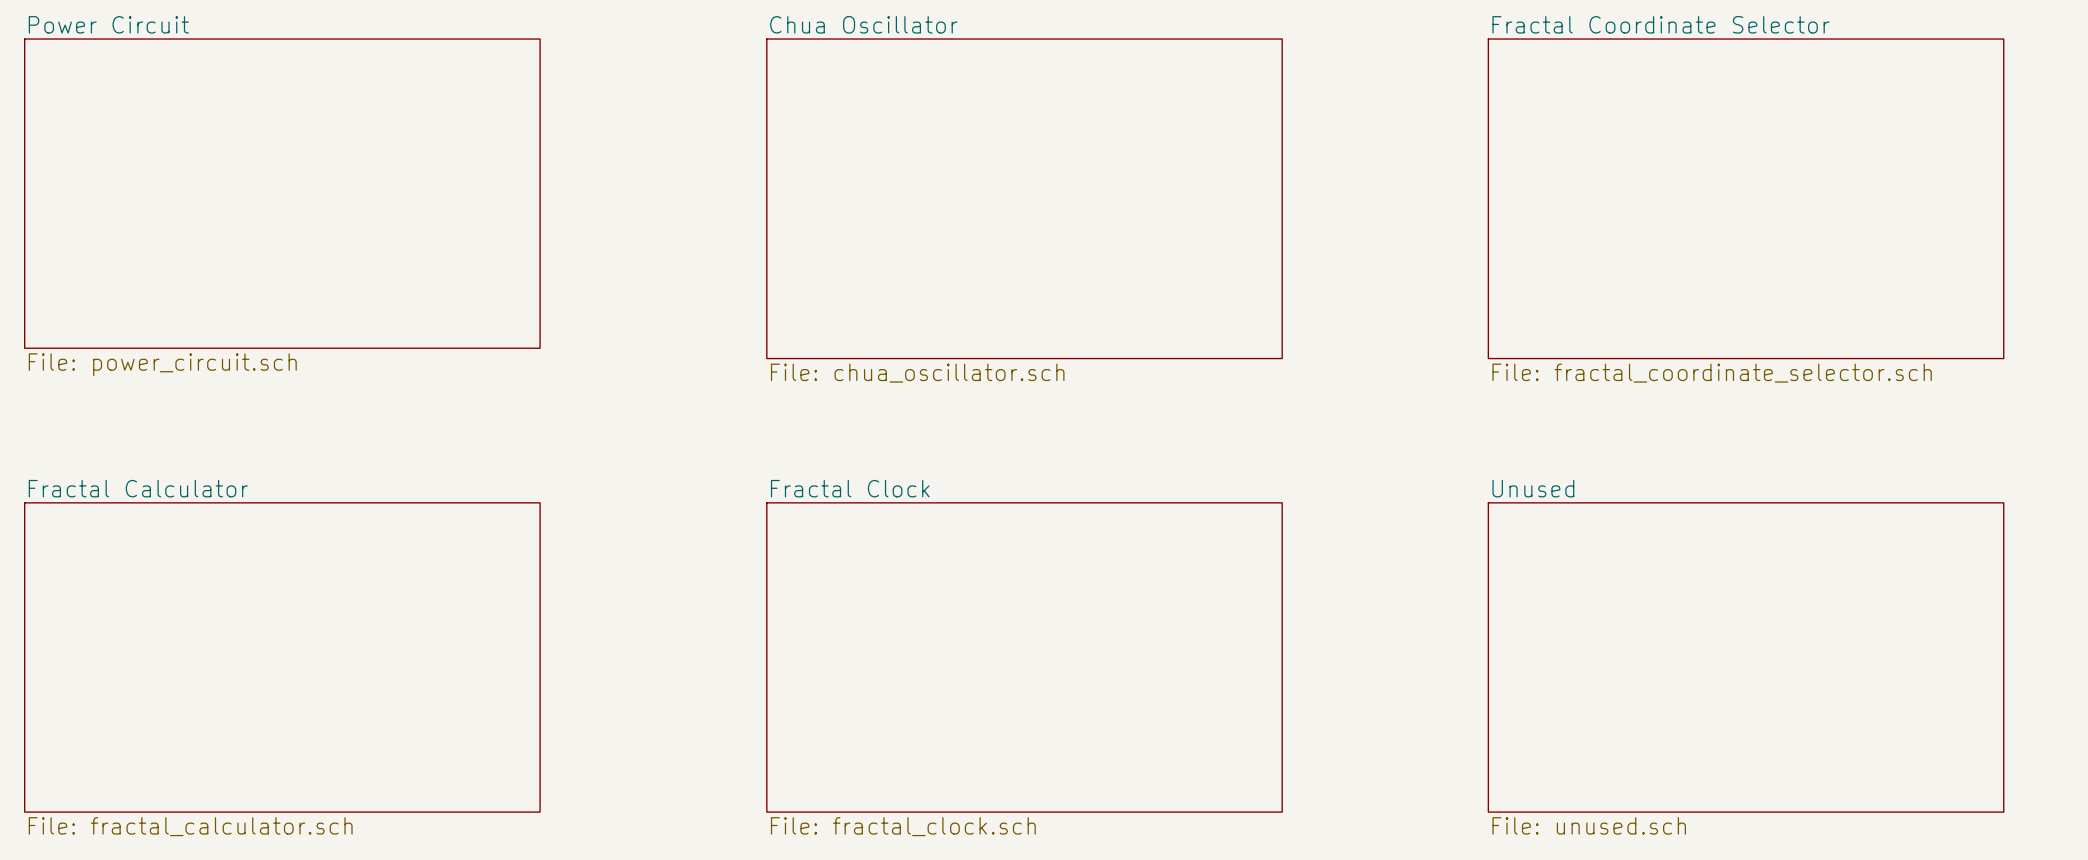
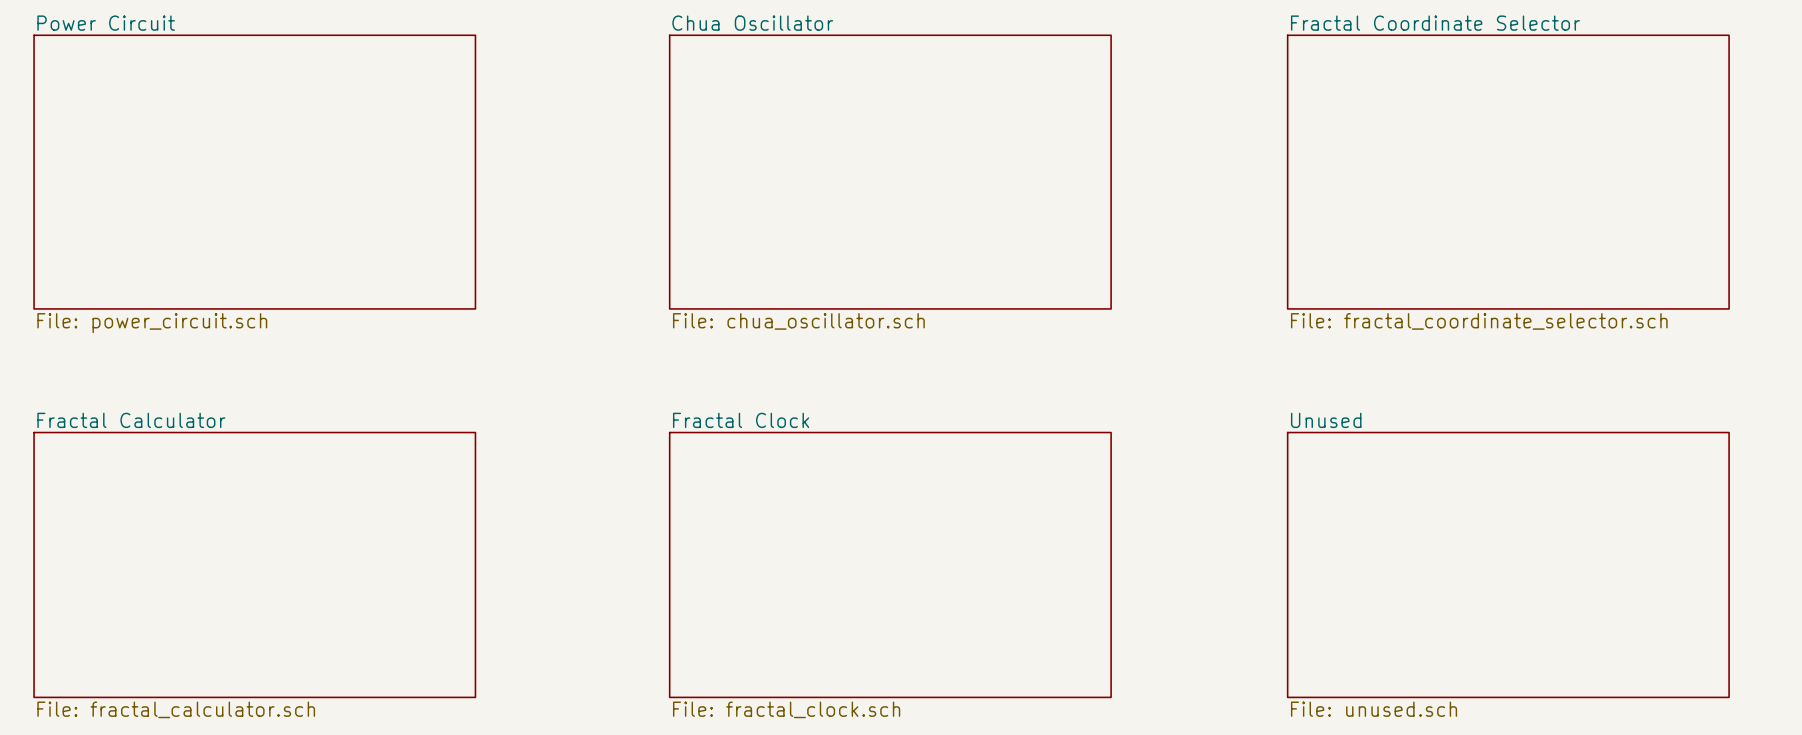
sheet Power Circuit shape: [24, 39, 541, 349] -> [34, 35, 476, 309]

